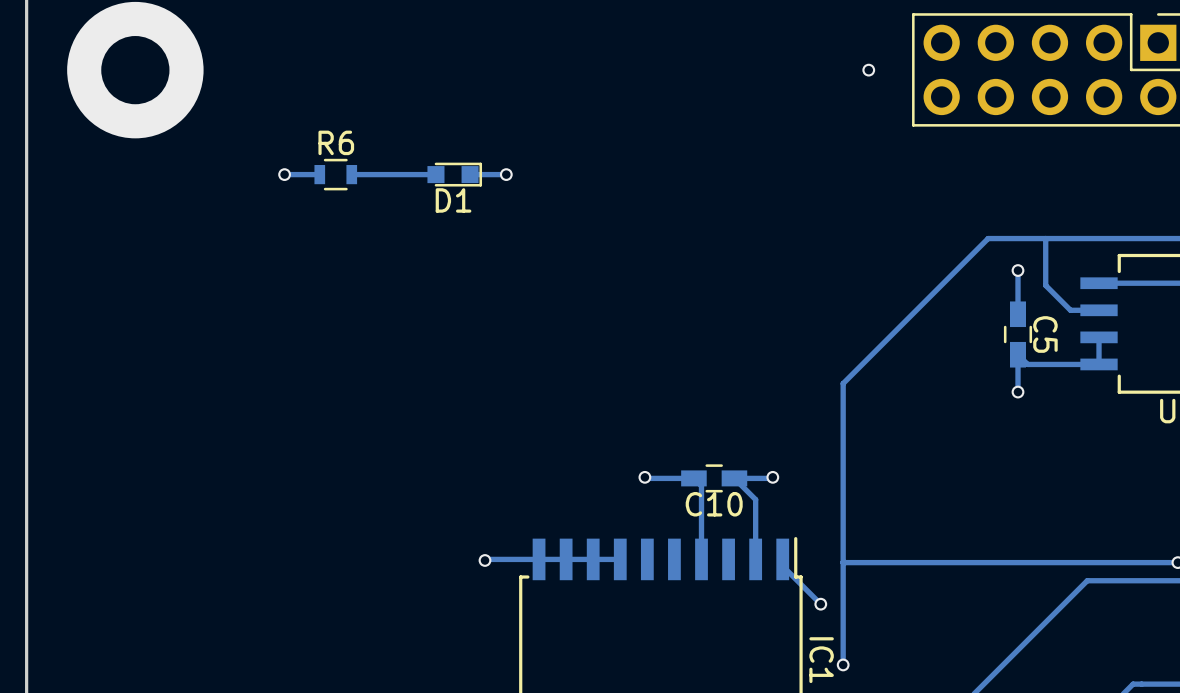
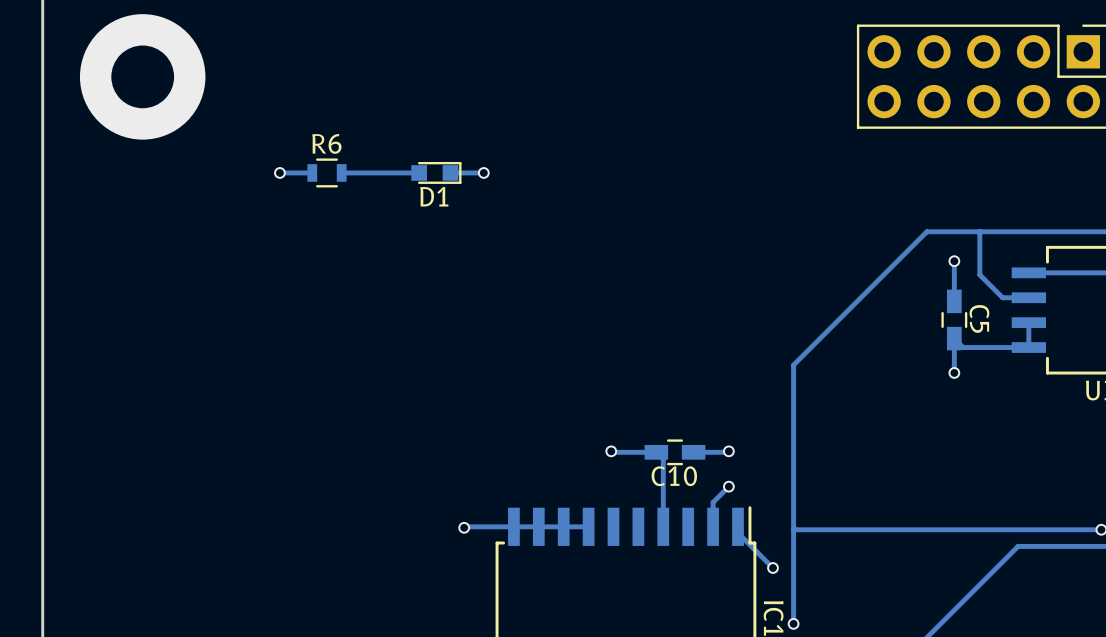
via: (868, 70) -> none
track: (734, 478) (755, 499) (755, 532) -> (728, 486) (713, 502)
via: none -> (728, 486)

